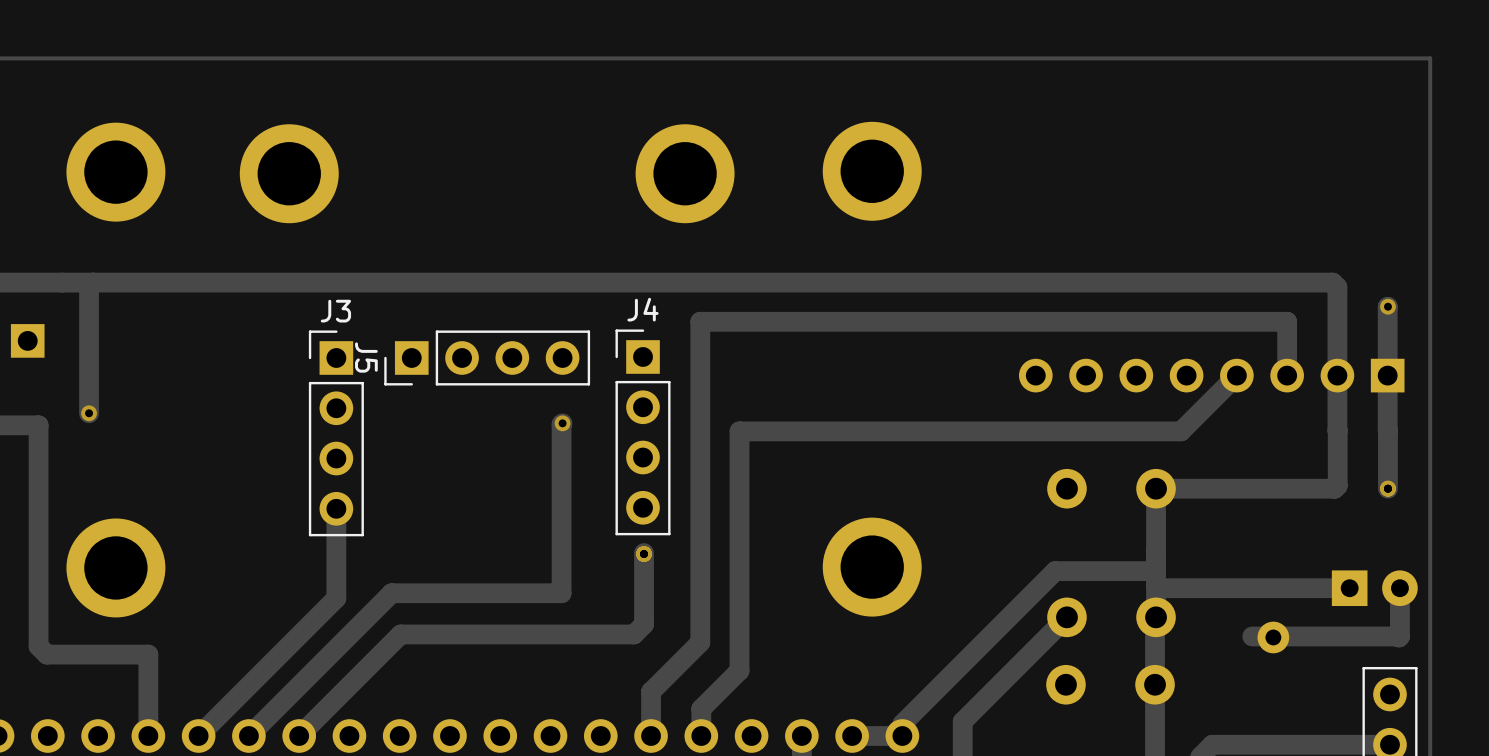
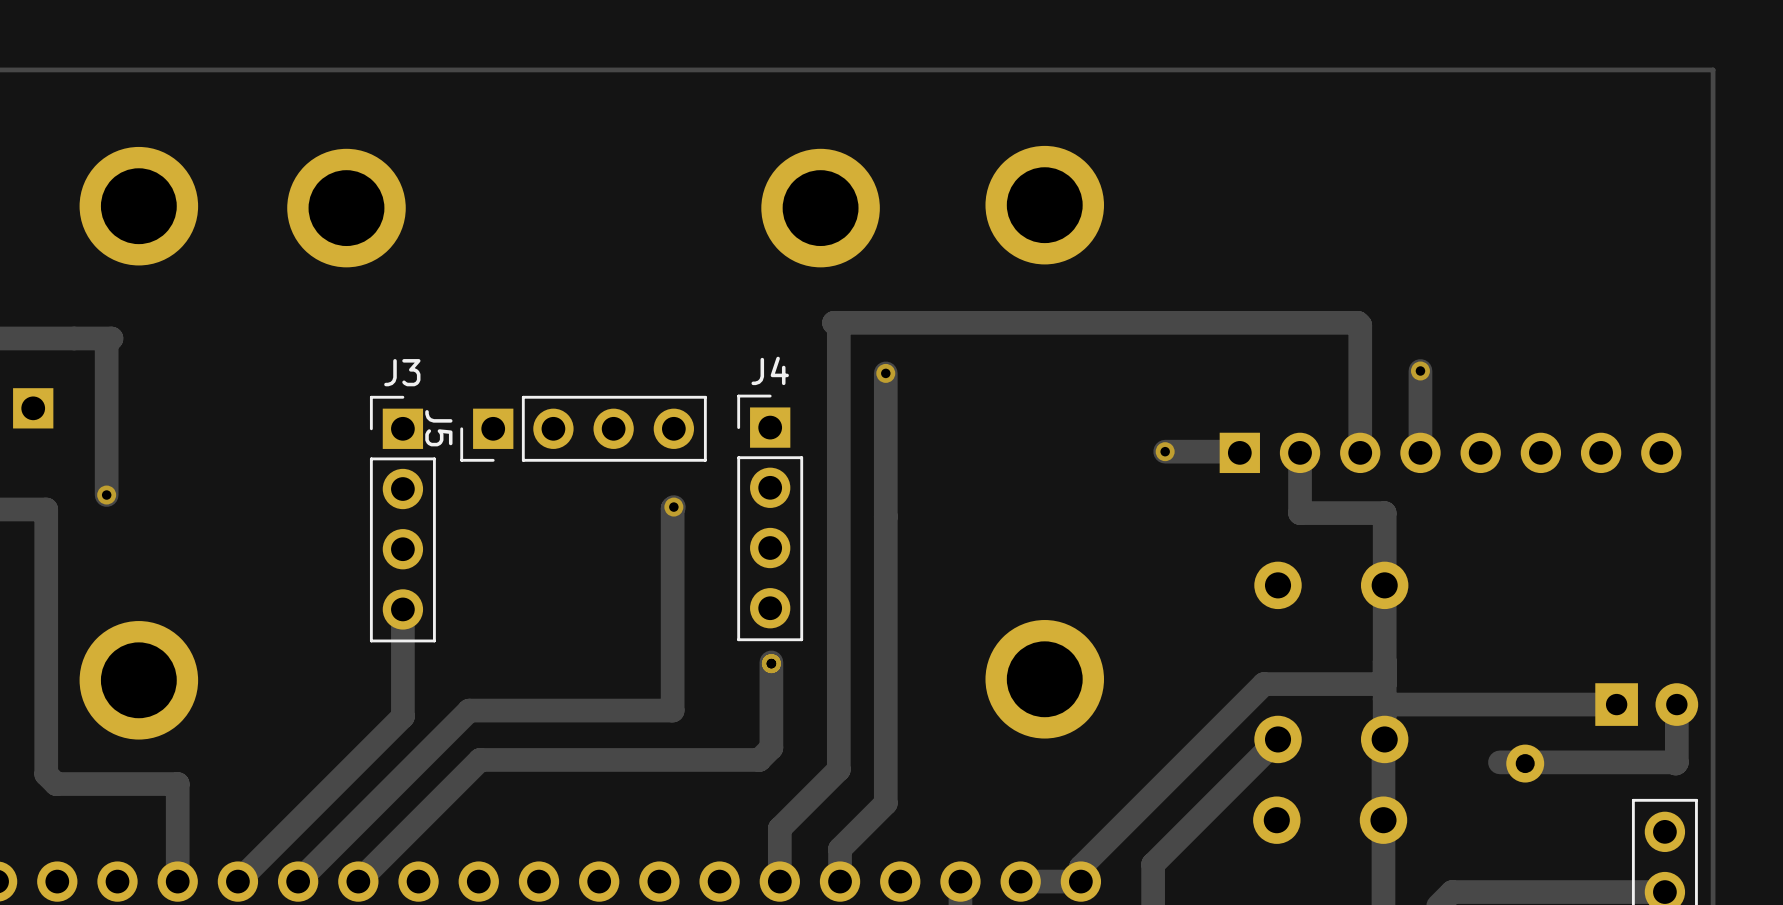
track: (93, 282) (1332, 282) (1337, 287) (1337, 485) (1334, 488) (1156, 488) -> (1300, 452) (1300, 513) (1384, 513) (1384, 585)
track: (1387, 306) (1387, 488) -> none
via: (1387, 306) -> none
track: none -> (1420, 370) (1420, 452)
via: none -> (1420, 370)
via: none -> (885, 373)
track: (700, 321) (1287, 321) (1287, 375) -> (838, 385) (838, 327) (834, 322) (1357, 322) (1360, 325) (1360, 452)
part rotation: 0° (1211, 375) -> 180° (1450, 452)
track: (1236, 375) (1181, 431) (739, 431) -> (885, 373) (885, 516)
track: none -> (1165, 451) (1239, 452)
via: none -> (1165, 451)
via: (1387, 488) -> none

